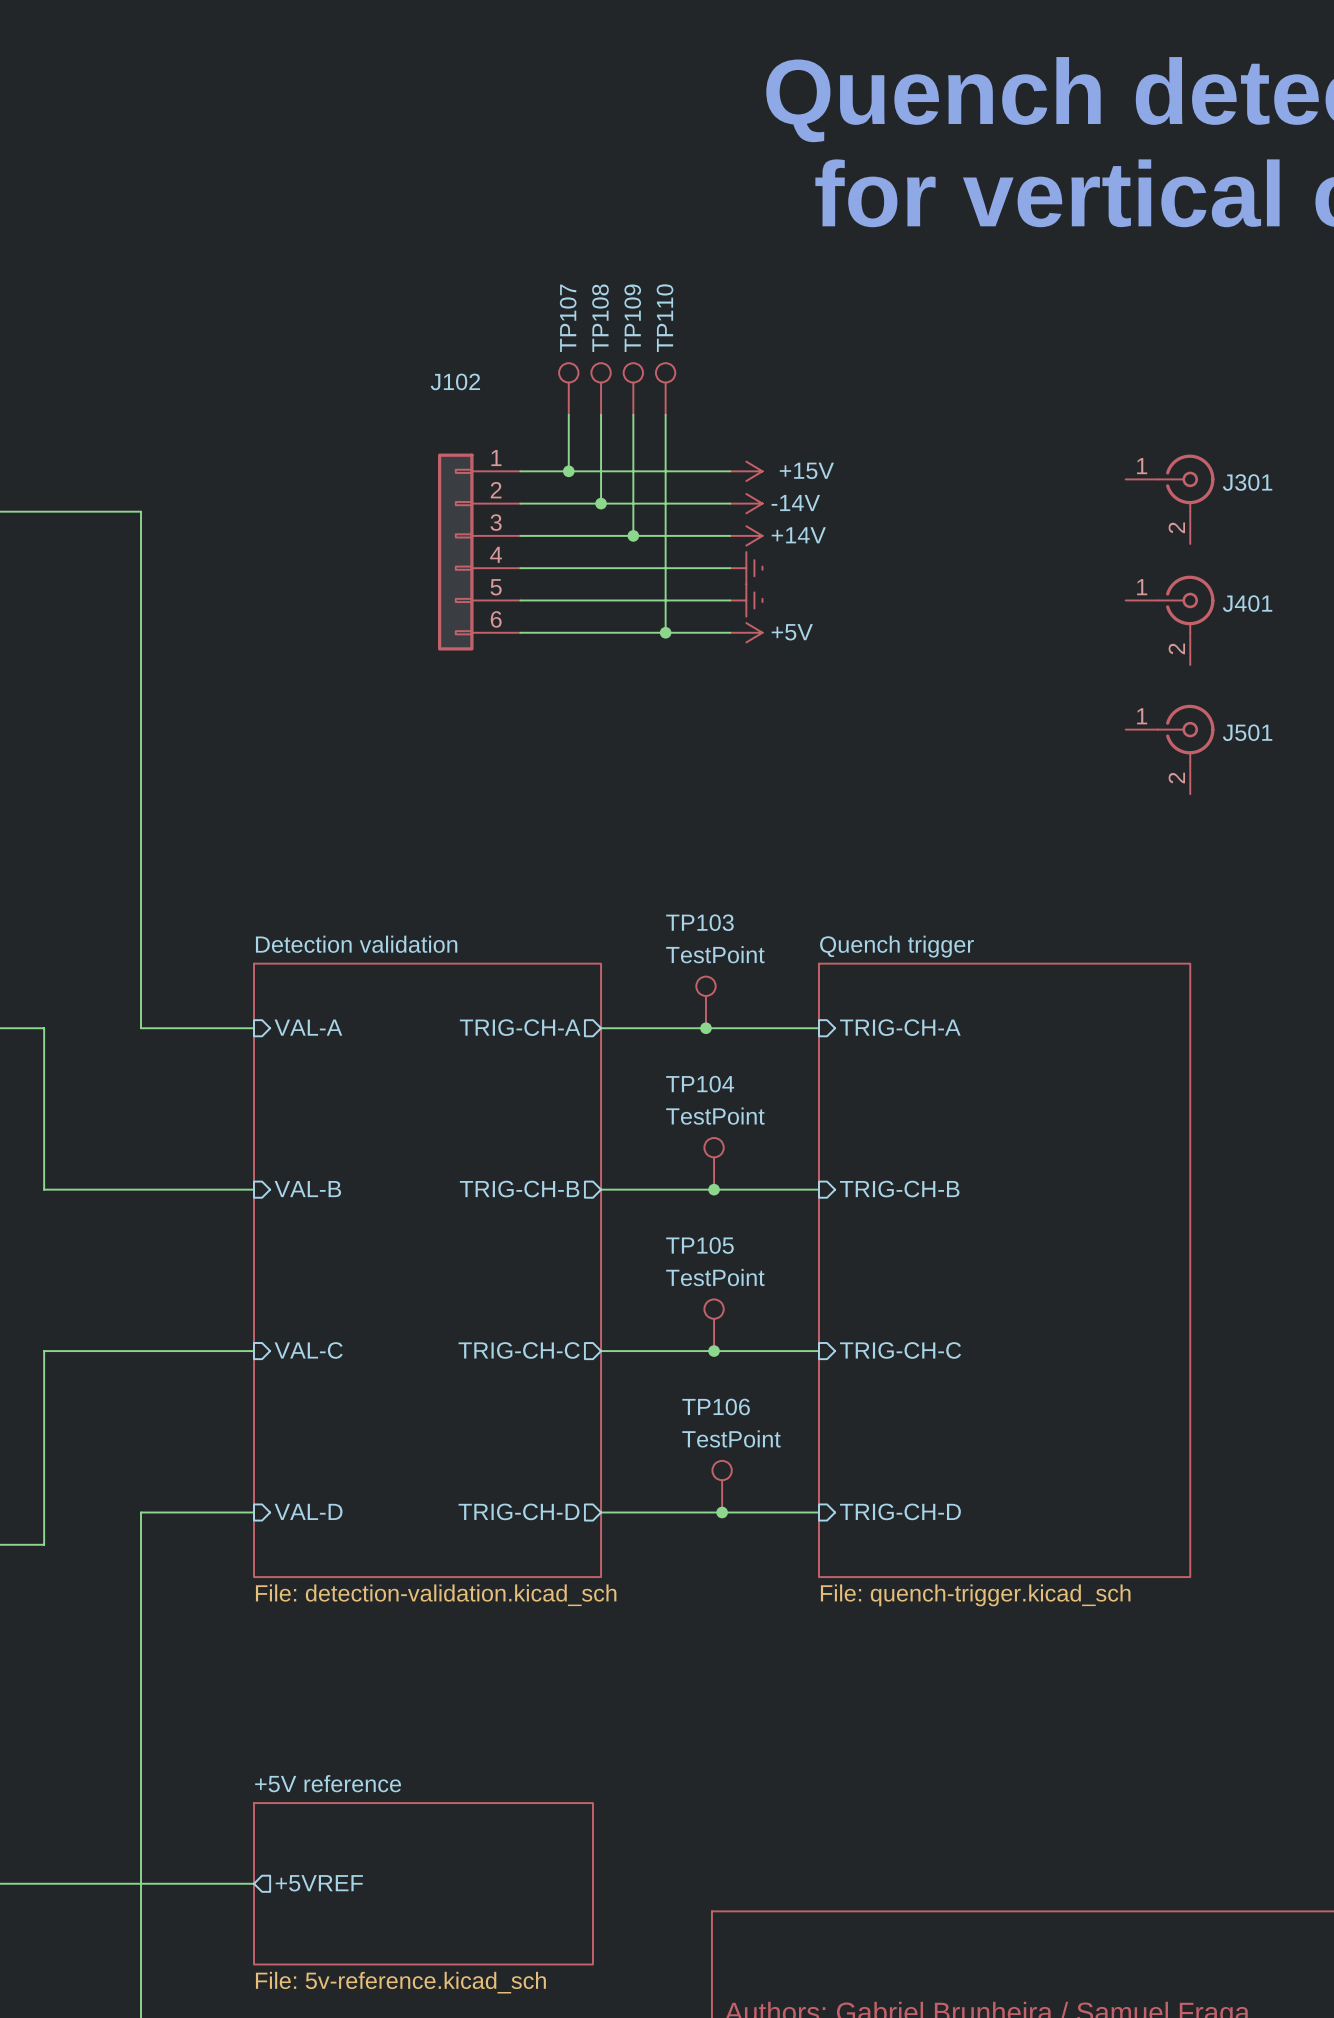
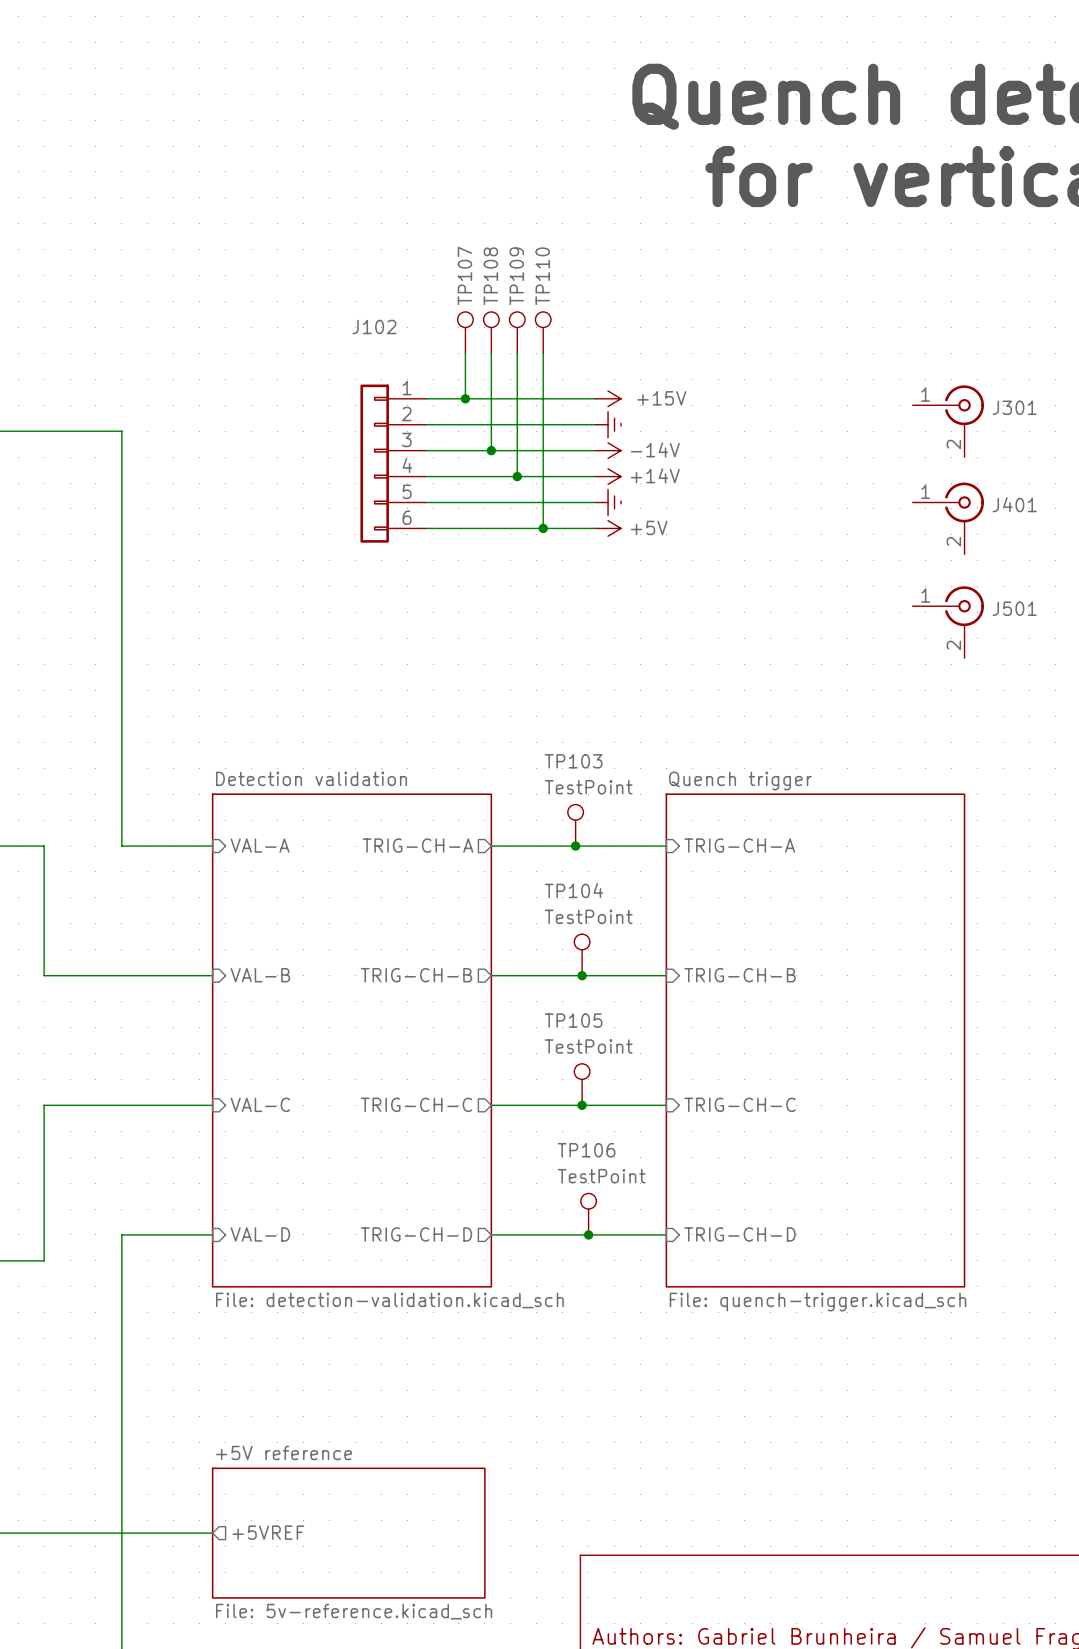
power symbol shape: [730, 493, 763, 514] -> [595, 411, 622, 438]
wire: none -> (491, 424) (491, 450)
junction: (601, 503) -> none
power symbol text: -14V (795, 503) -> none
junction: none -> (491, 450)
wire: none -> (517, 450) (517, 476)
junction: (633, 535) -> none
power symbol: +14V (746, 535) -> -14V (608, 450)
power symbol shape: [730, 552, 763, 585] -> [595, 468, 622, 485]
power symbol text: none -> +14V (655, 475)
junction: none -> (517, 476)

